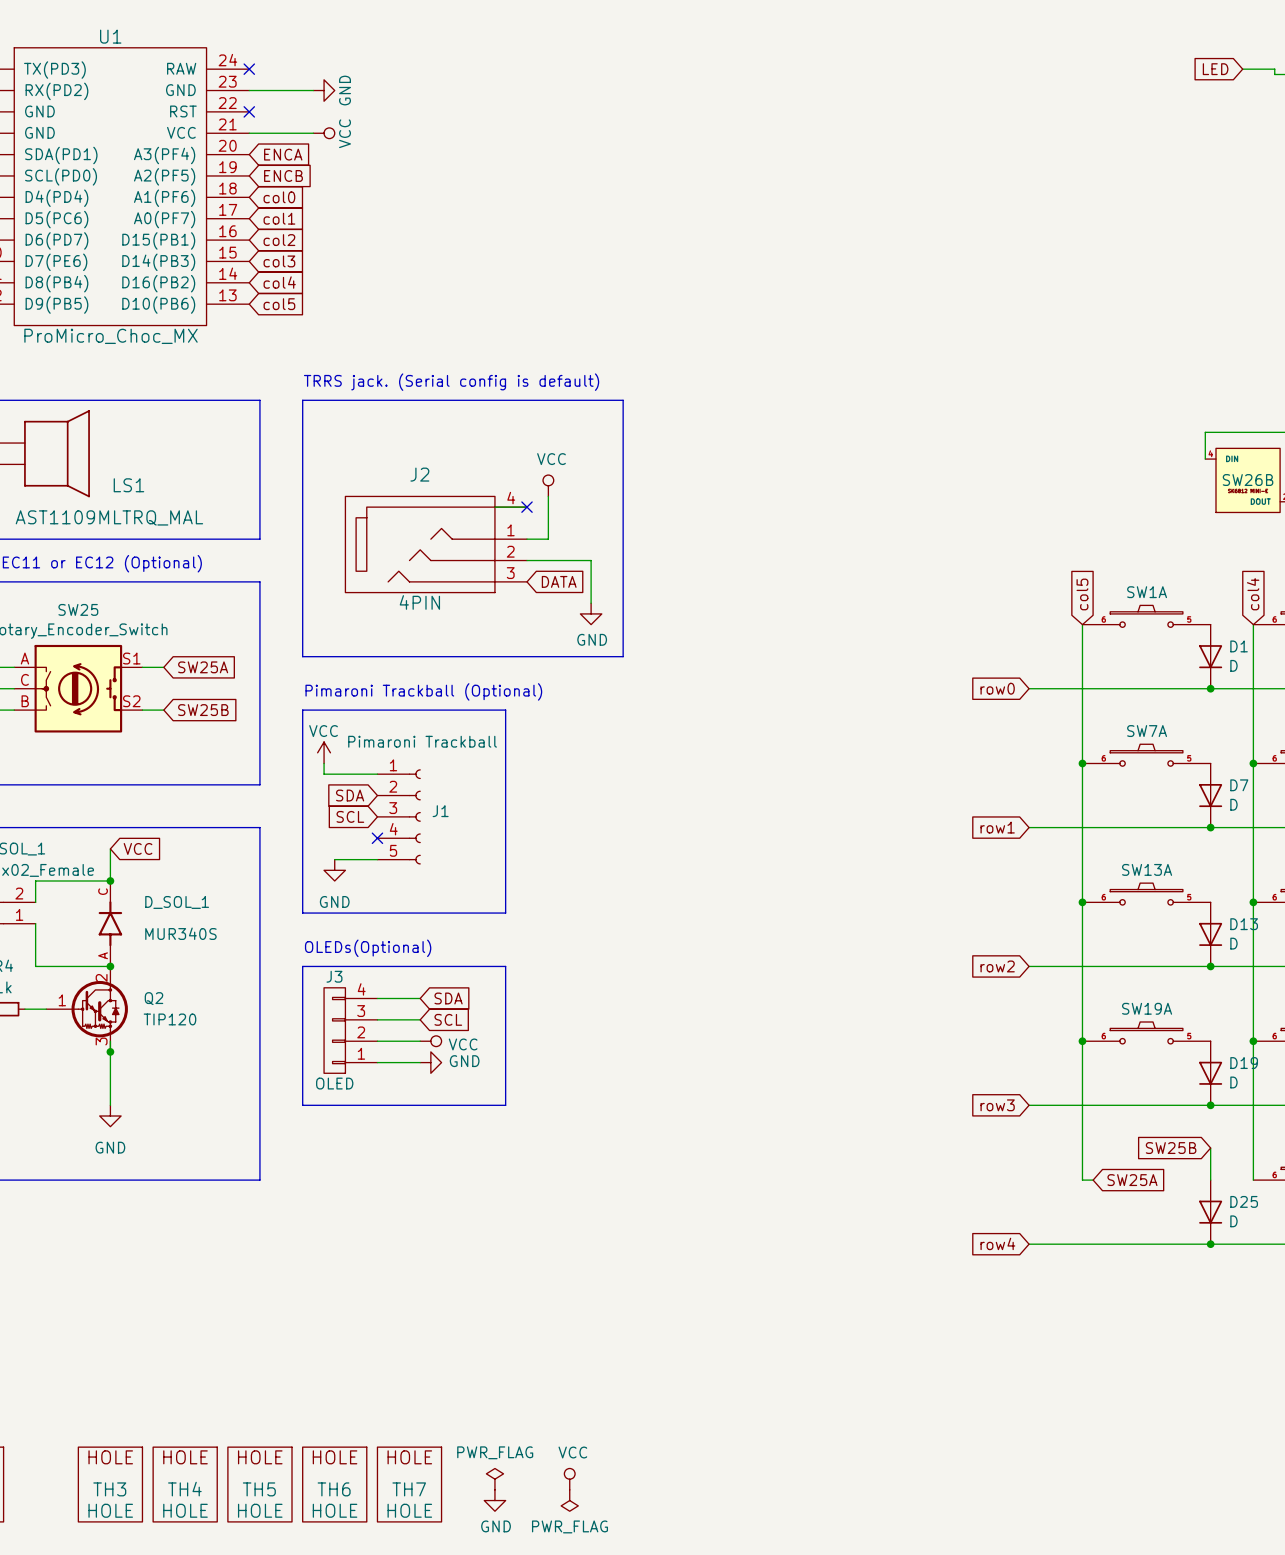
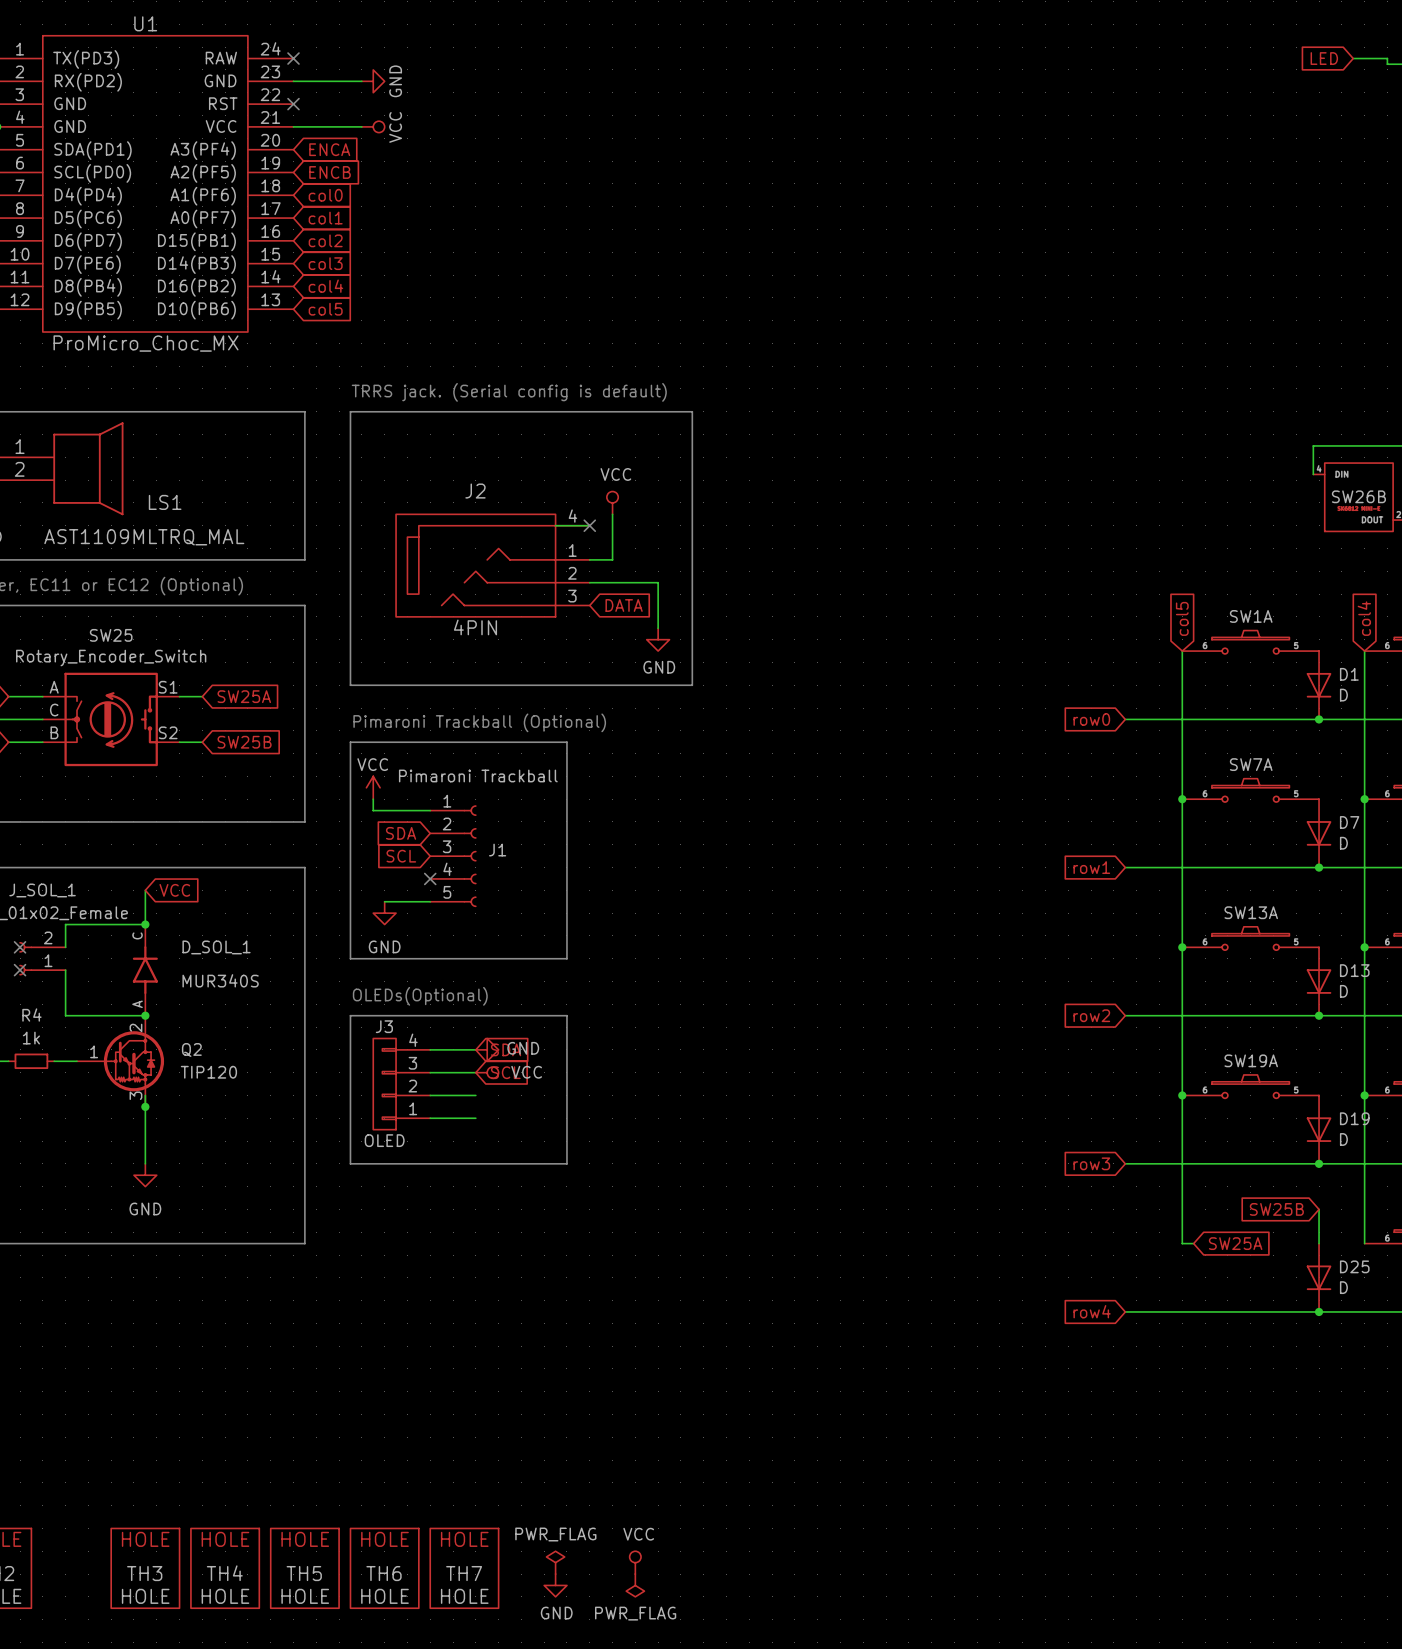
power symbol position: VCC (430, 1041) -> VCC (487, 1072)
power symbol text position: VCC (463, 1044) -> VCC (526, 1072)
power symbol position: GND (430, 1062) -> GND (487, 1049)

